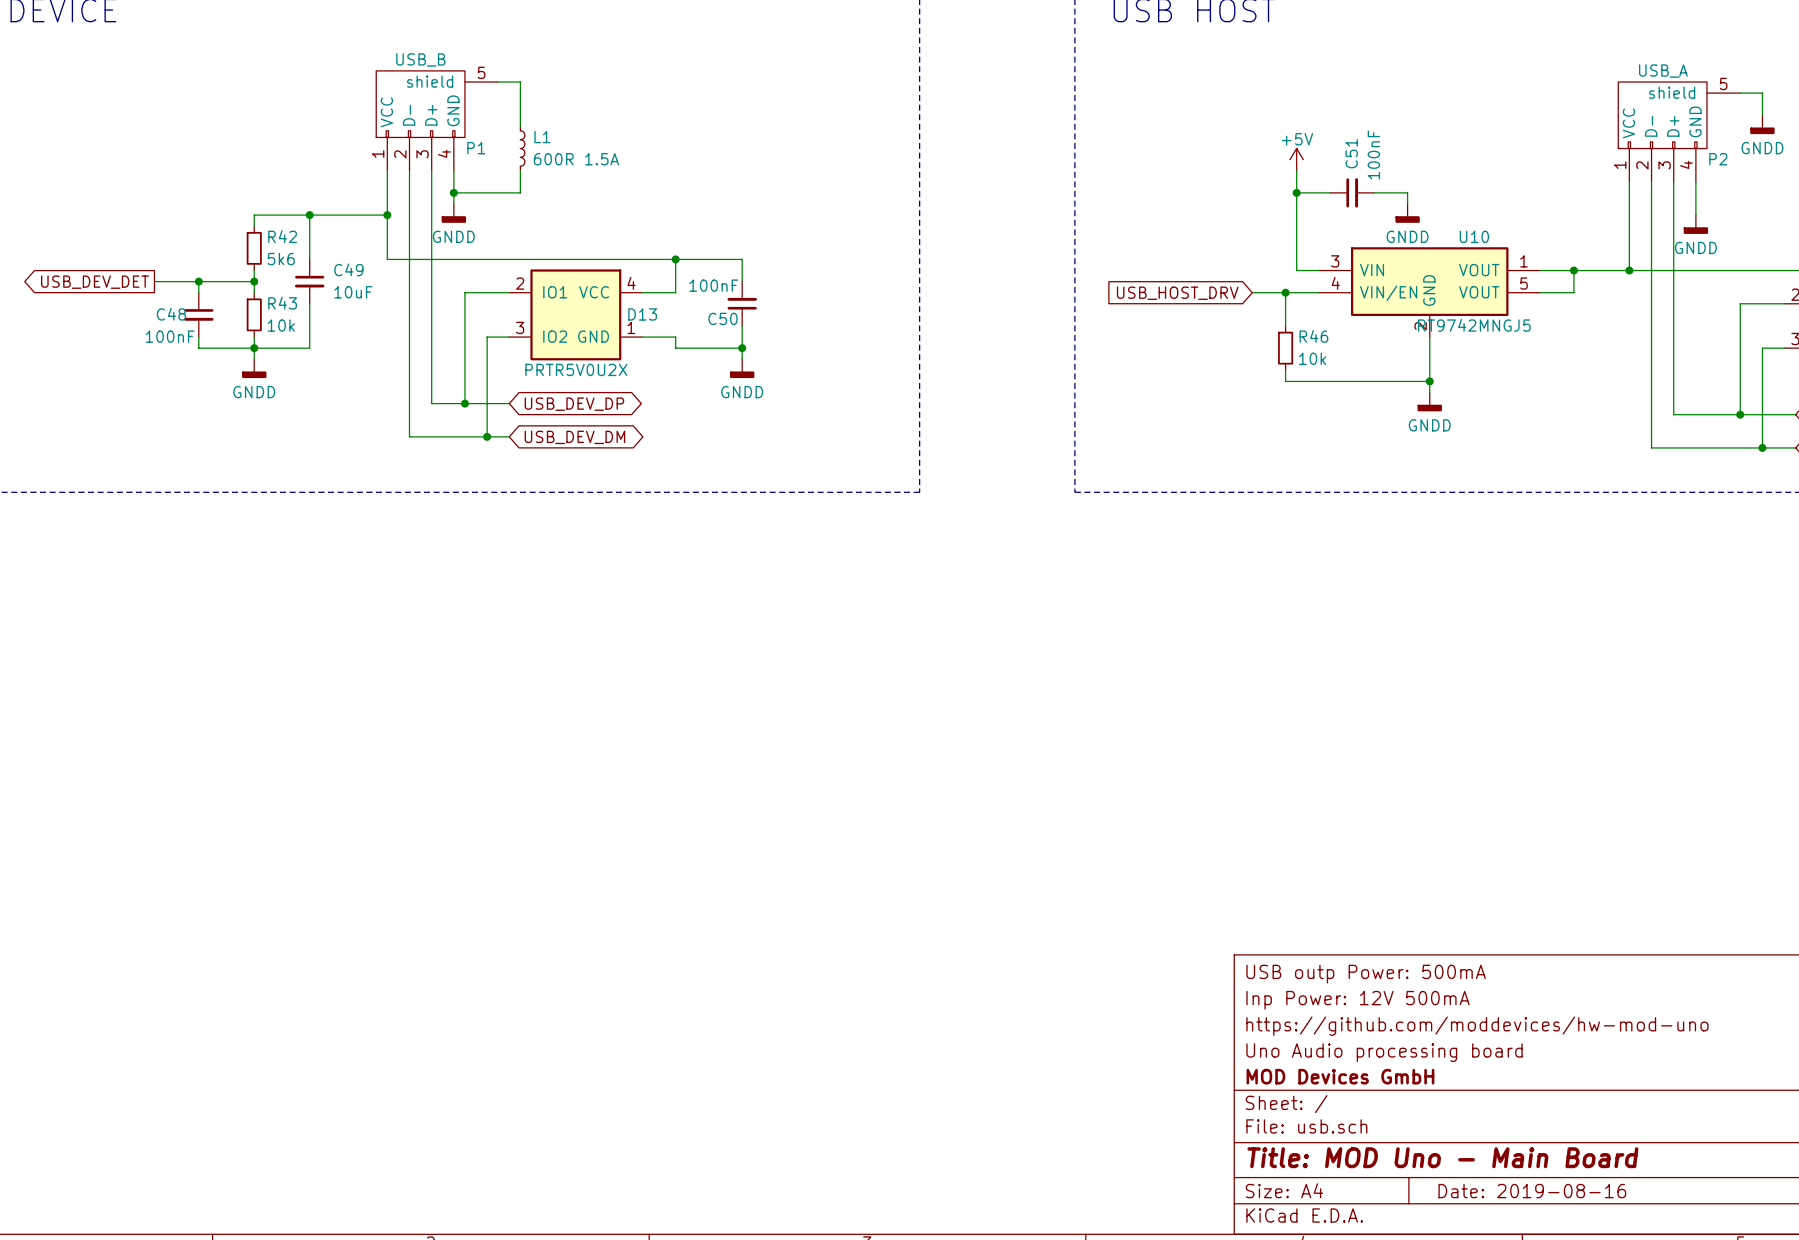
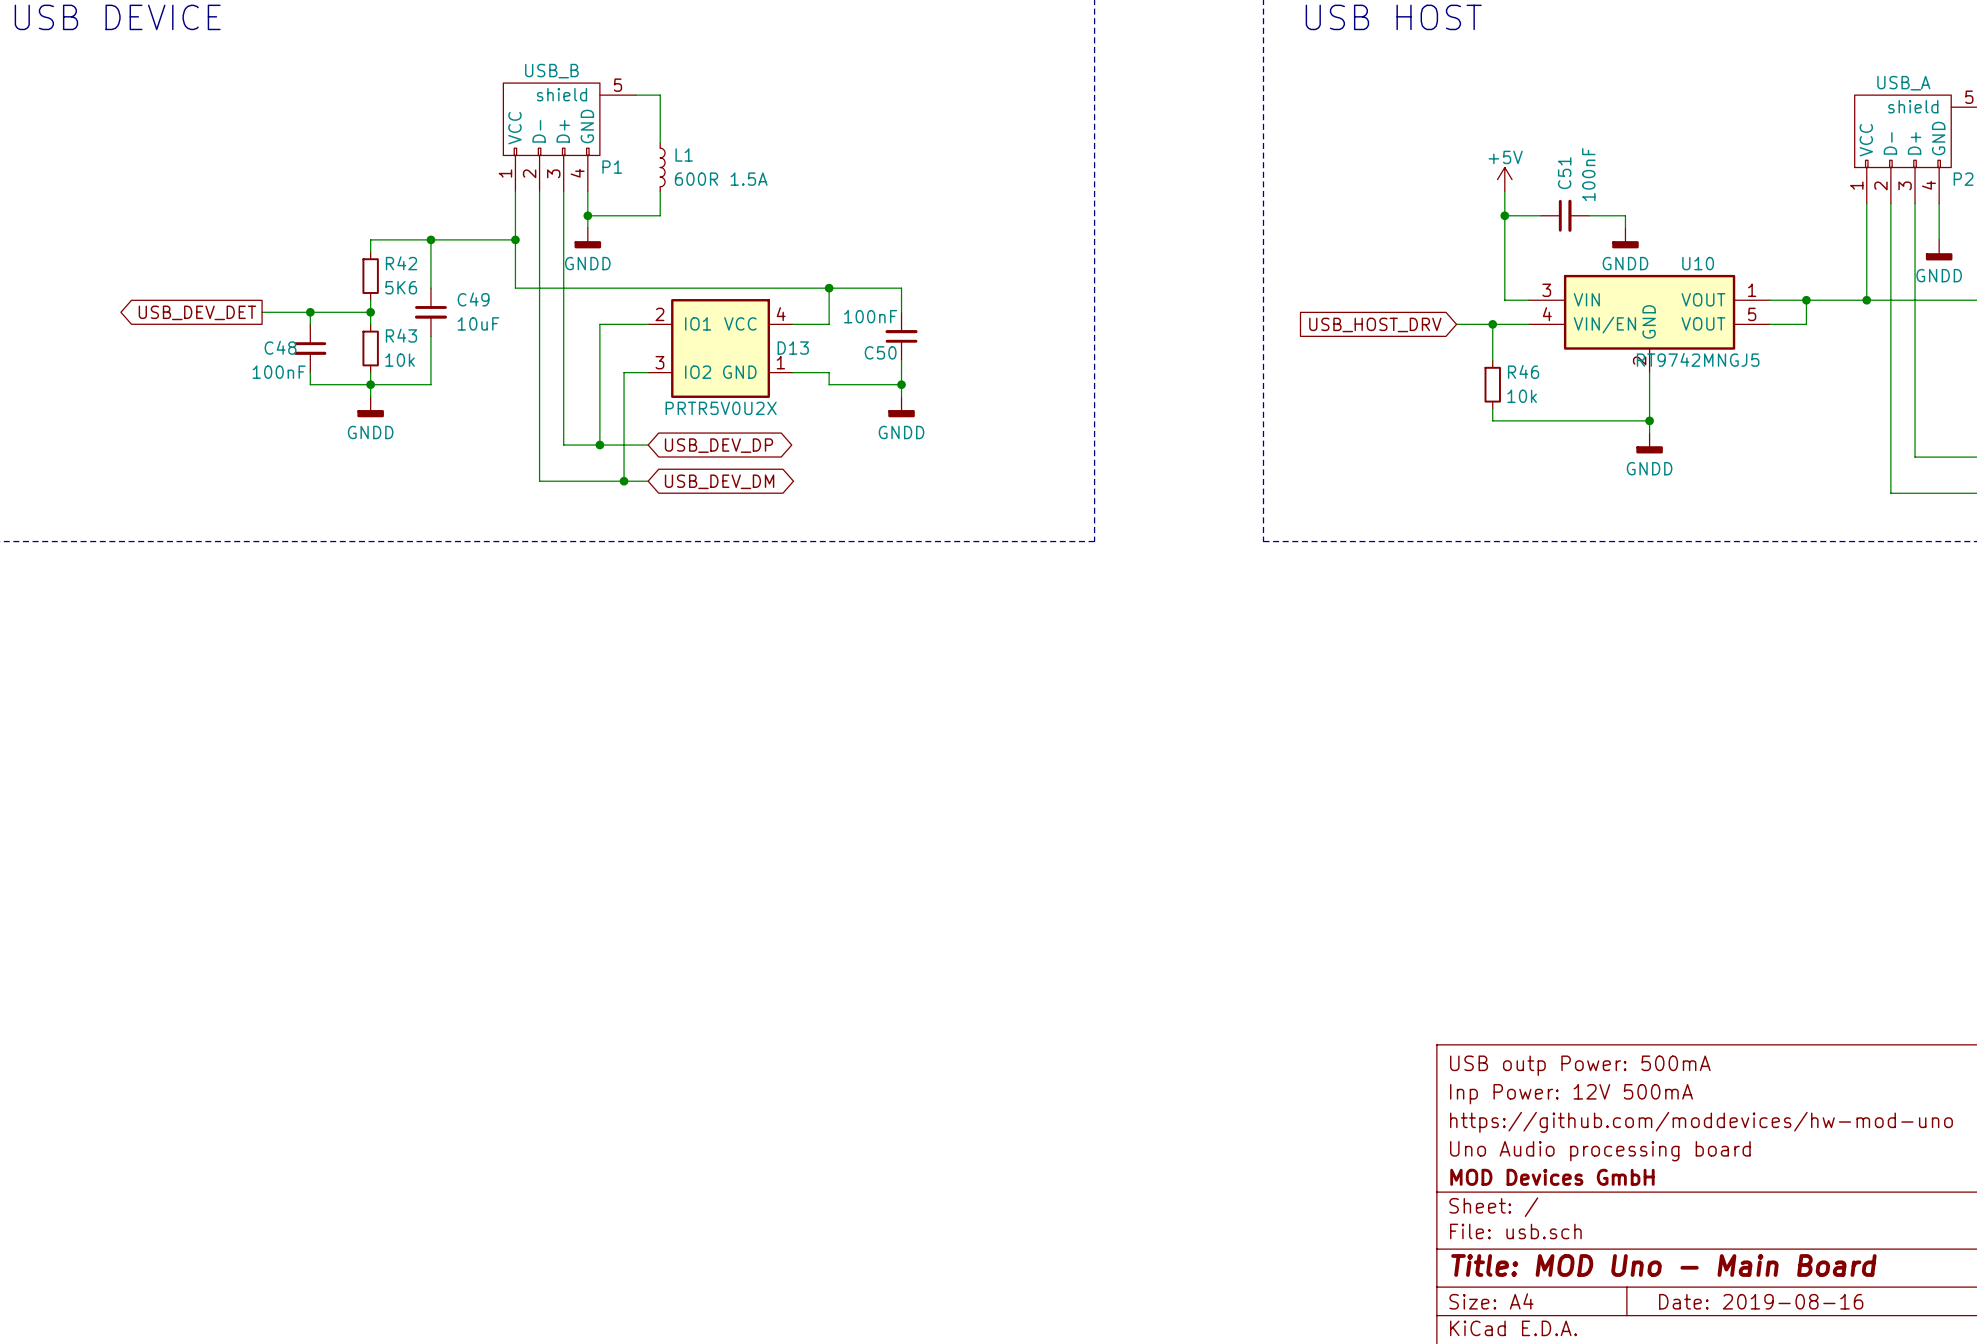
R42 value: 5k6 (281, 259) -> 5K6 (401, 287)

